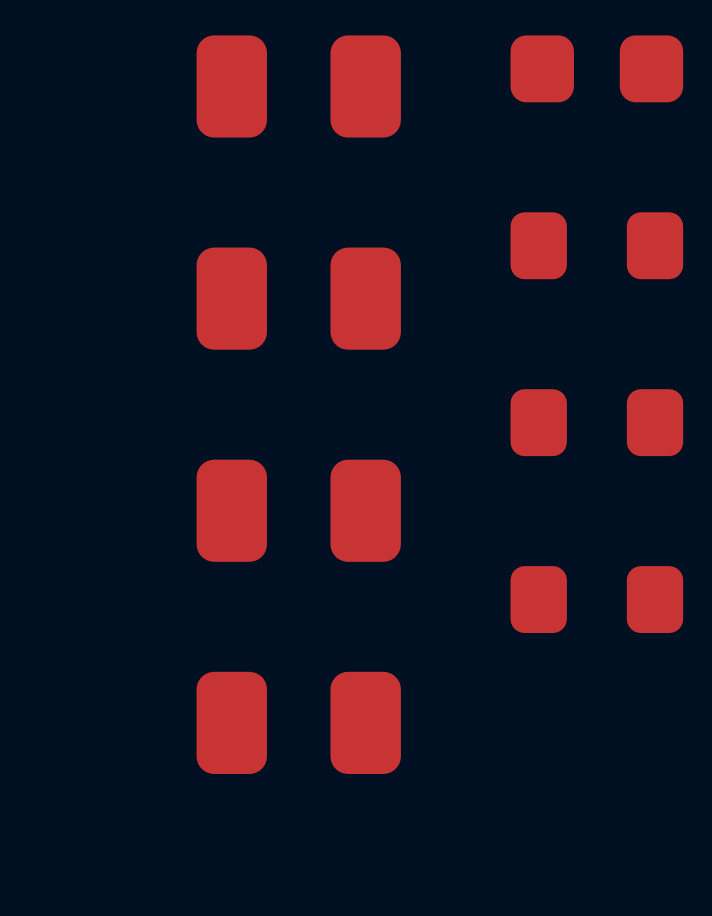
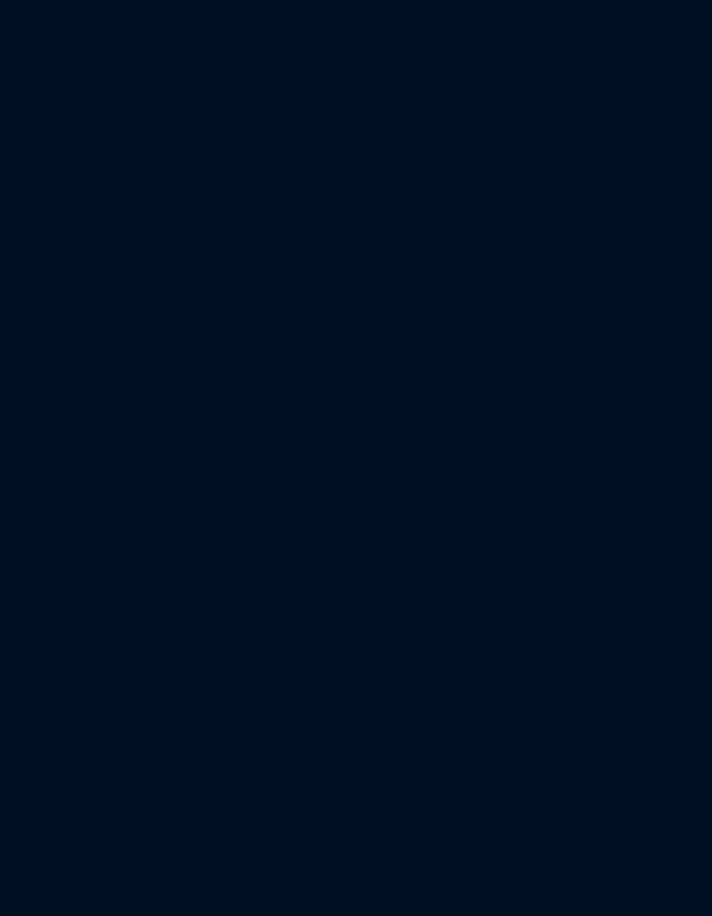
part: (596, 68) -> none
part: (298, 86) -> none
part: (596, 245) -> none
part: (298, 298) -> none
part: (596, 422) -> none
part: (298, 510) -> none
part: (596, 599) -> none
part: (298, 722) -> none

